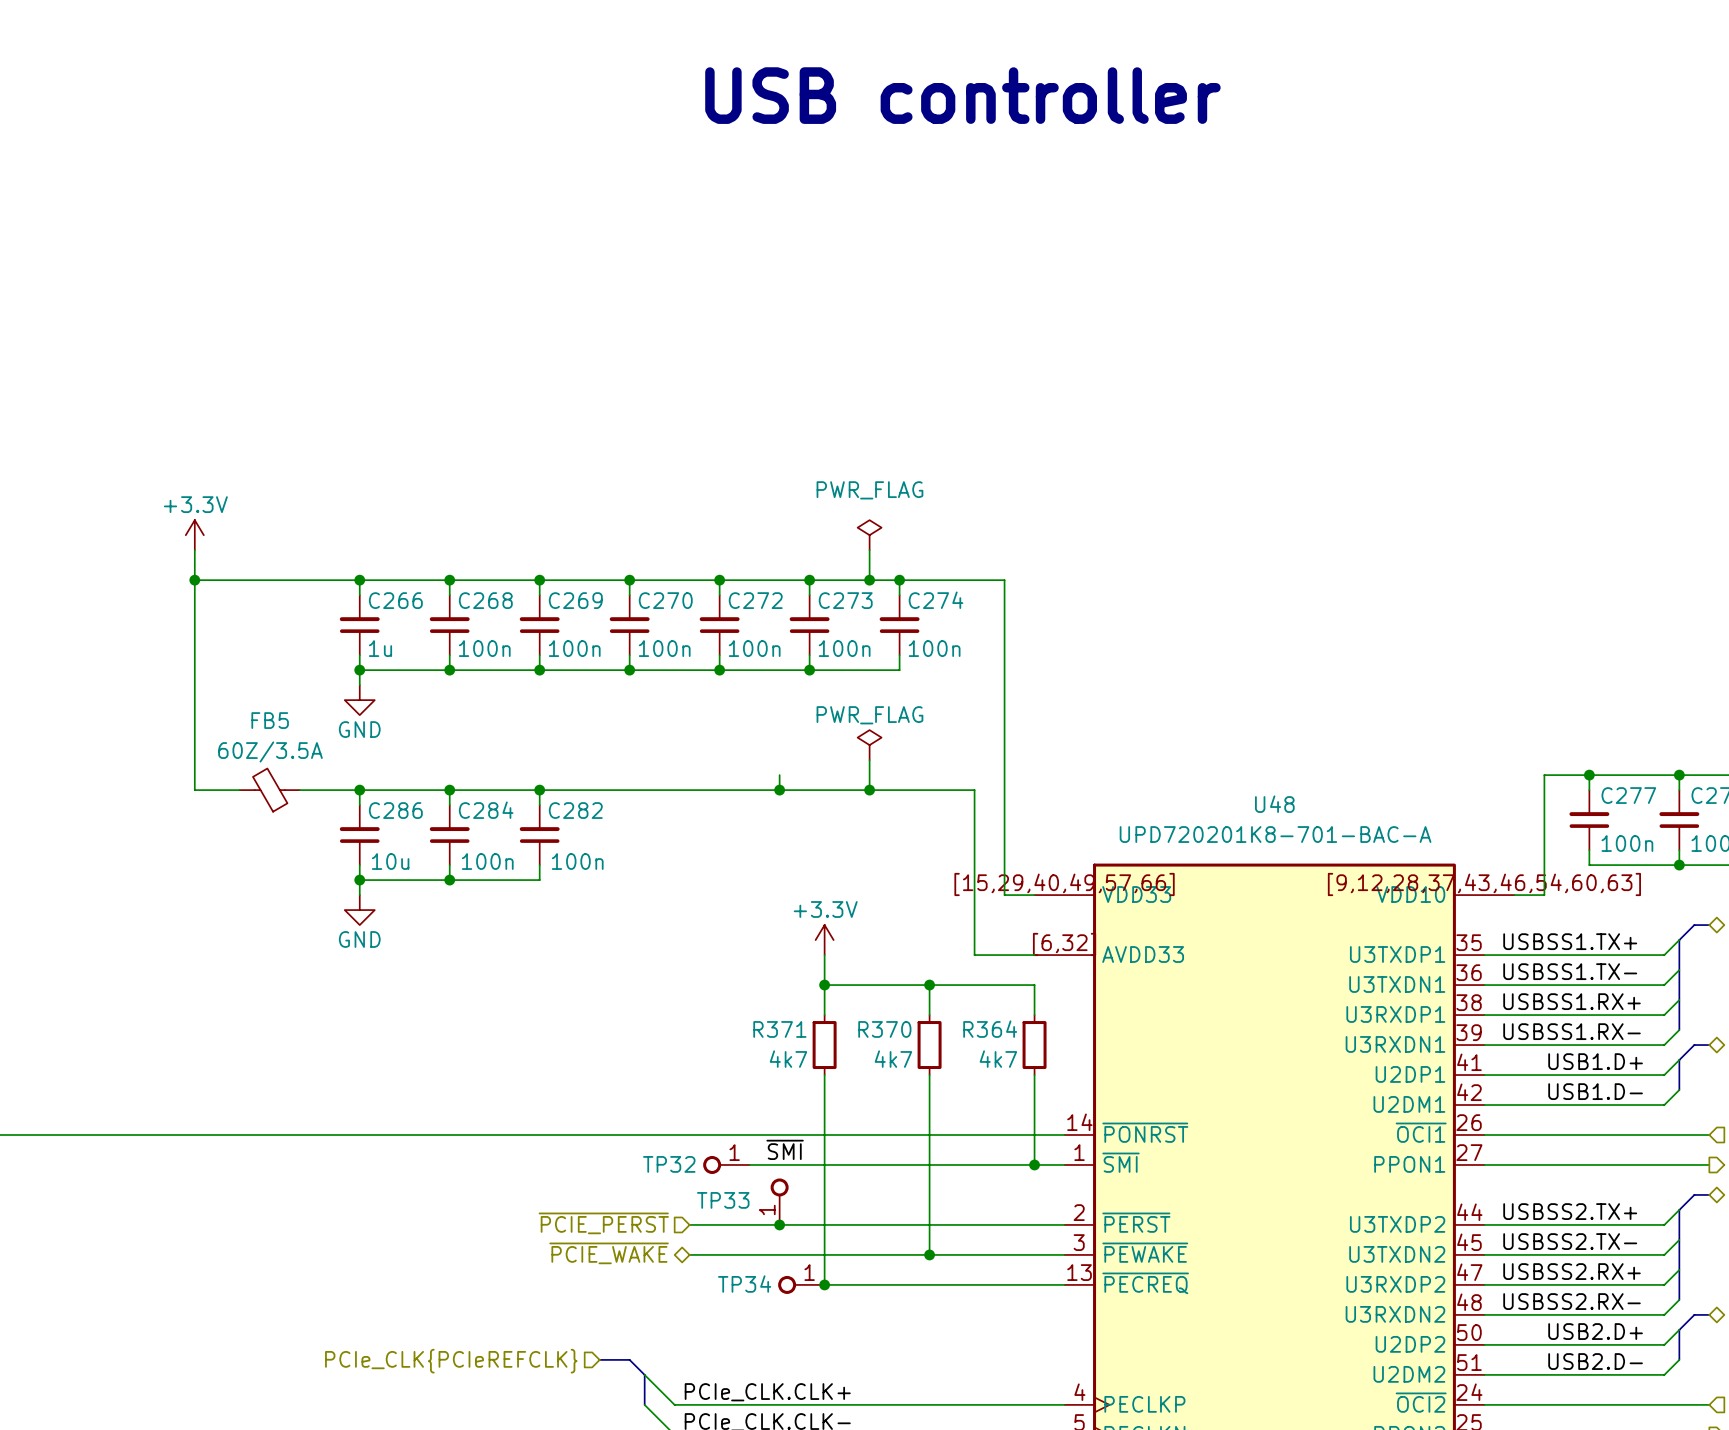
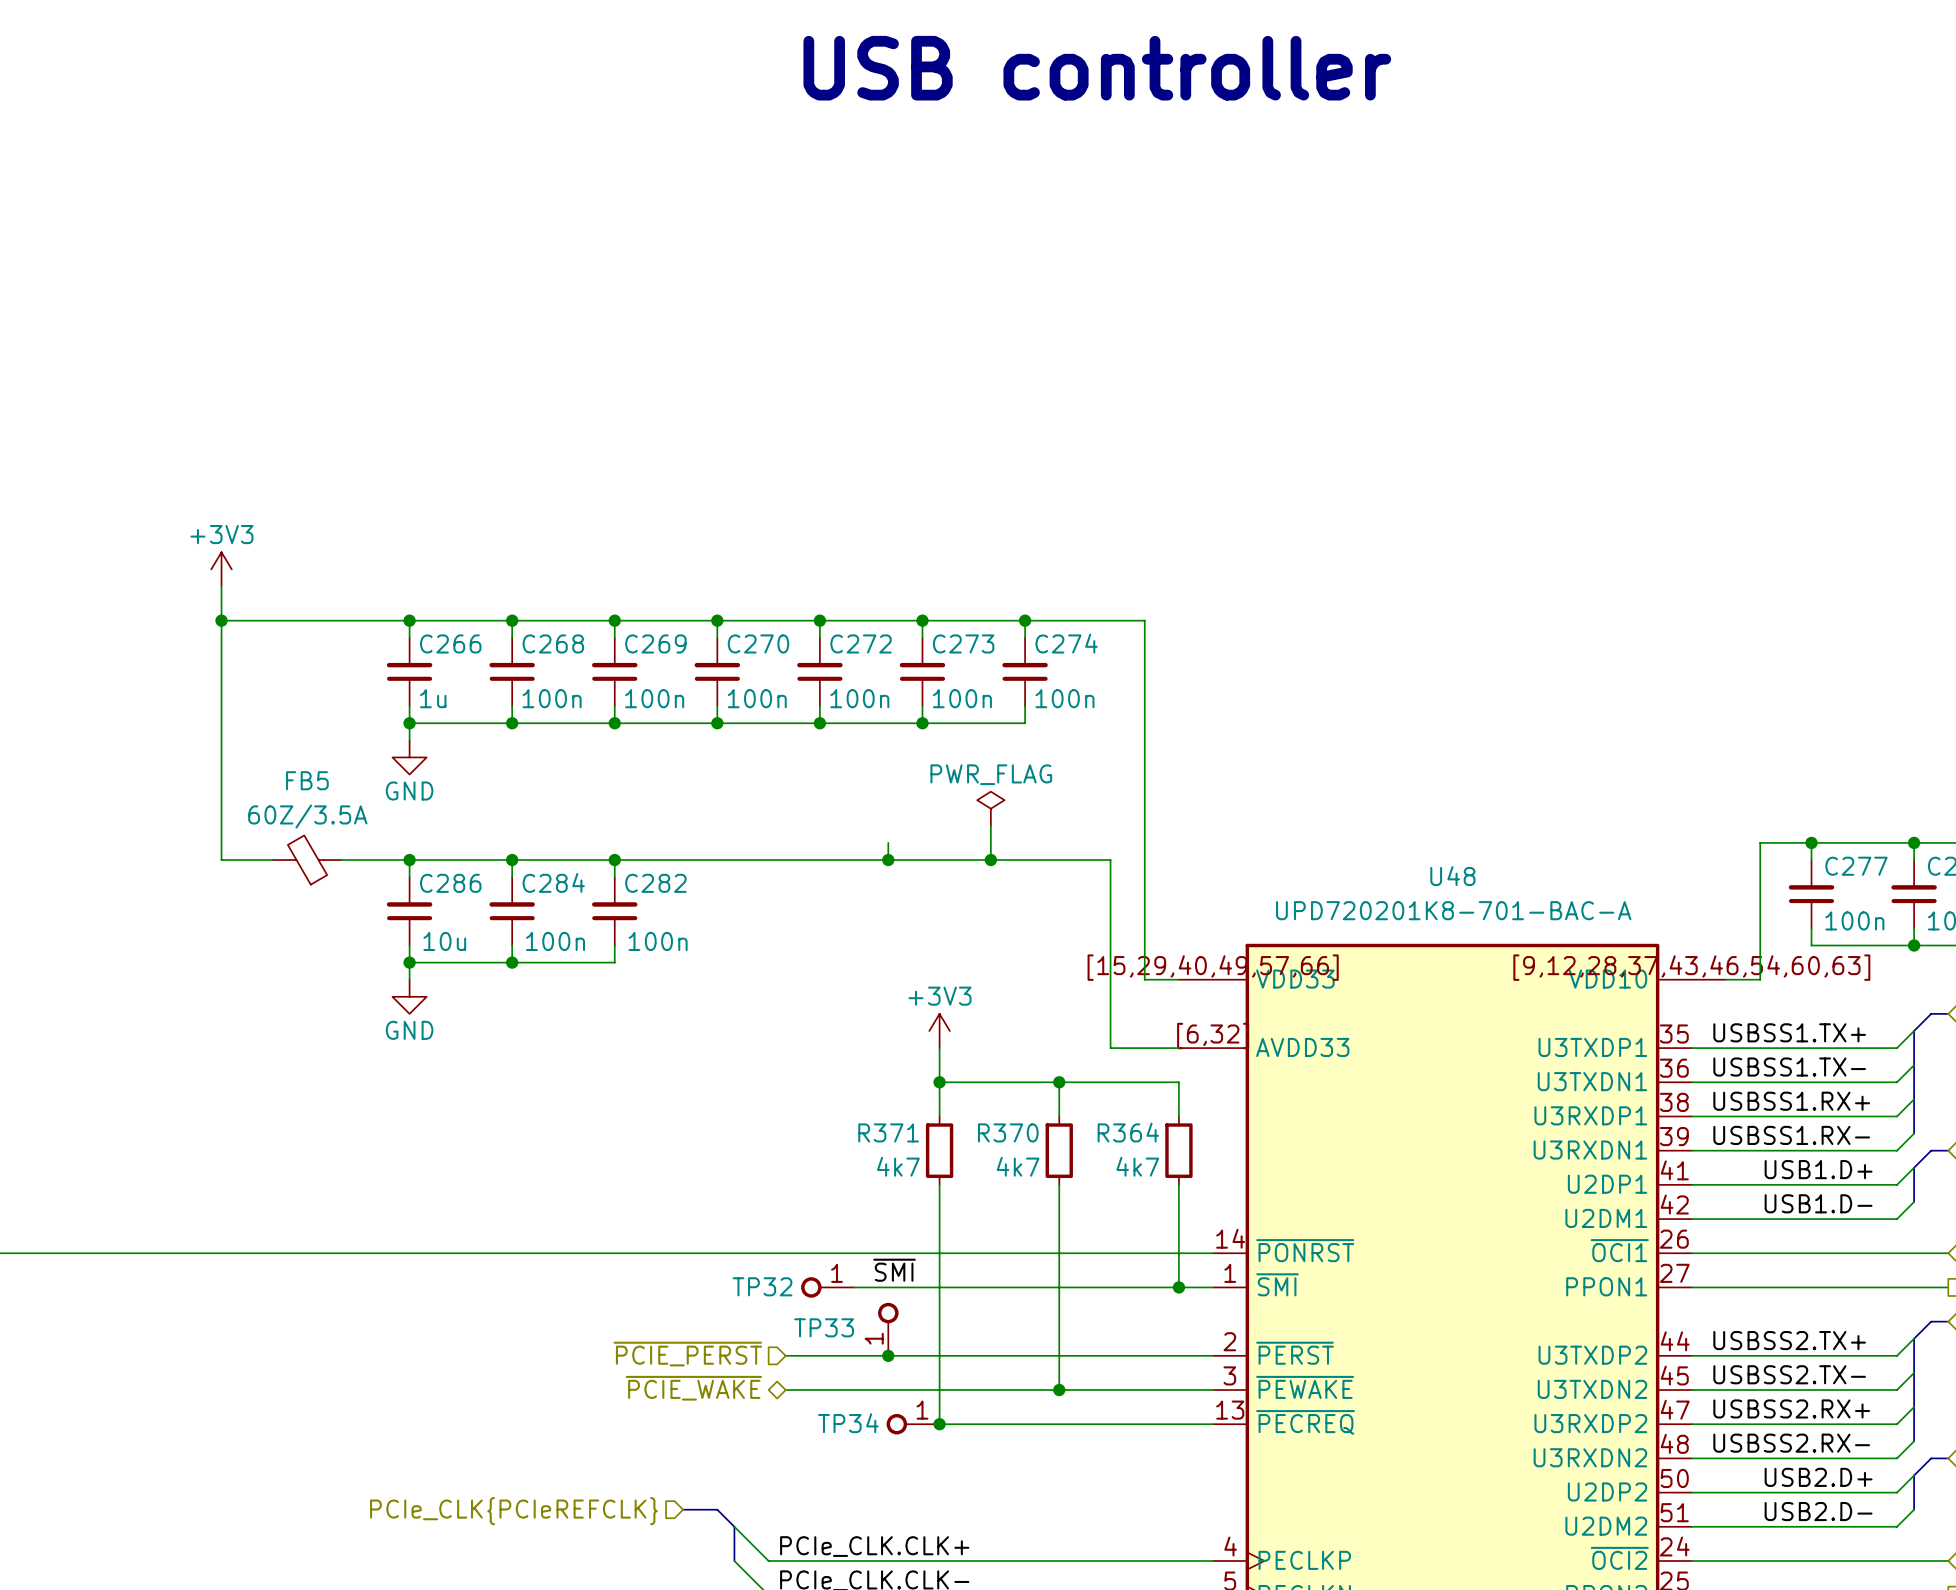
power symbol: +3.3V (194, 535) -> +3V3 (221, 569)
power symbol: PWR_FLAG (869, 535) -> none
wire: (869, 550) (869, 580) -> none
junction: (869, 580) -> none
power symbol: +3.3V (824, 940) -> +3V3 (939, 1030)

